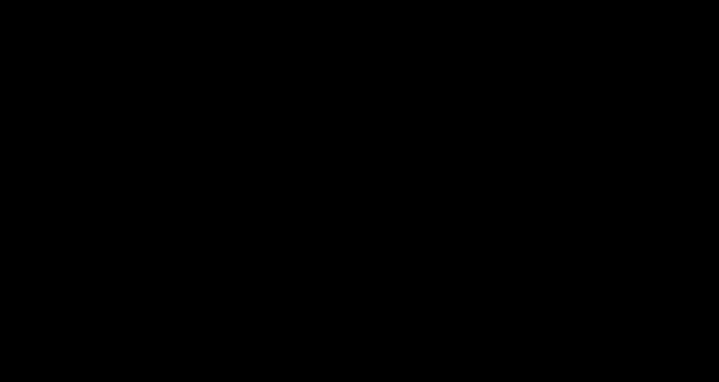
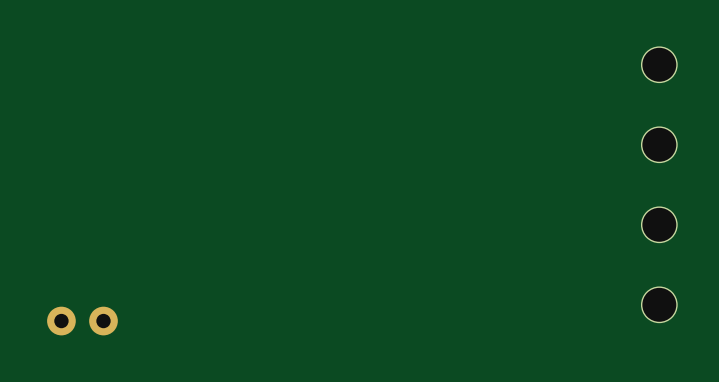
part: none -> (659, 64)
part: none -> (659, 144)
part: none -> (659, 224)
part: none -> (659, 304)
part: none -> (82, 321)

